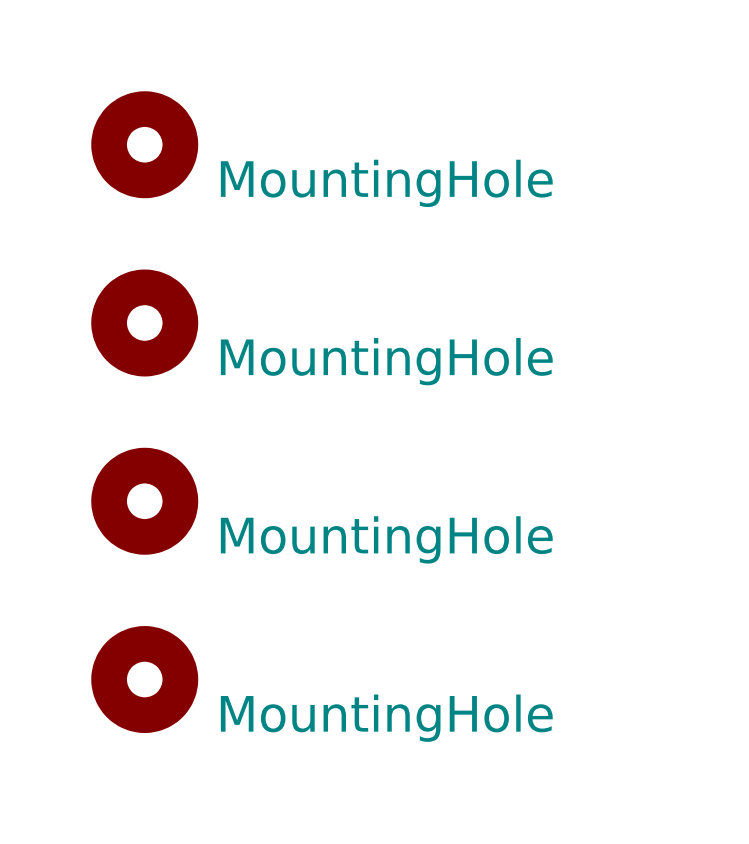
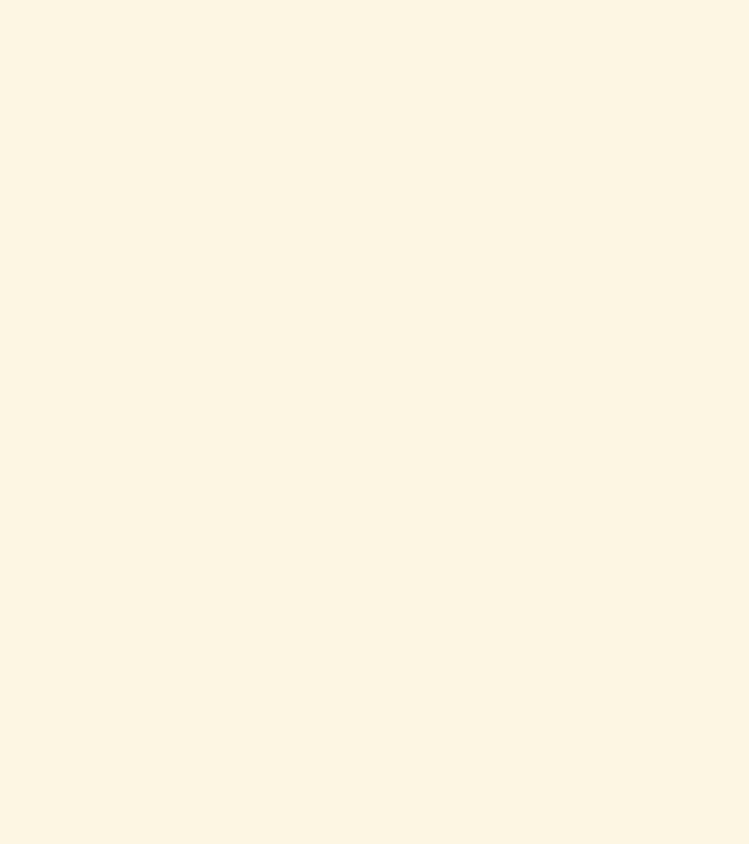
part: MountingHole (144, 144) -> none
part: MountingHole (144, 323) -> none
part: MountingHole (144, 501) -> none
part: MountingHole (144, 679) -> none

